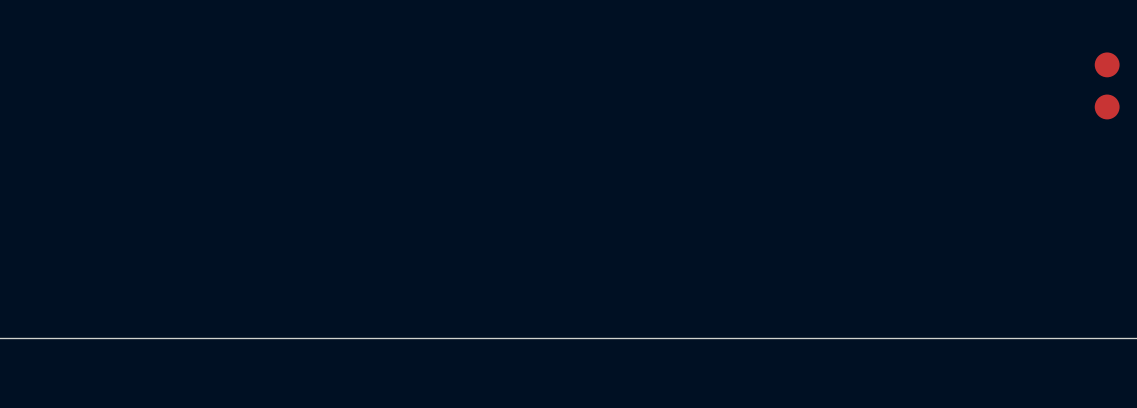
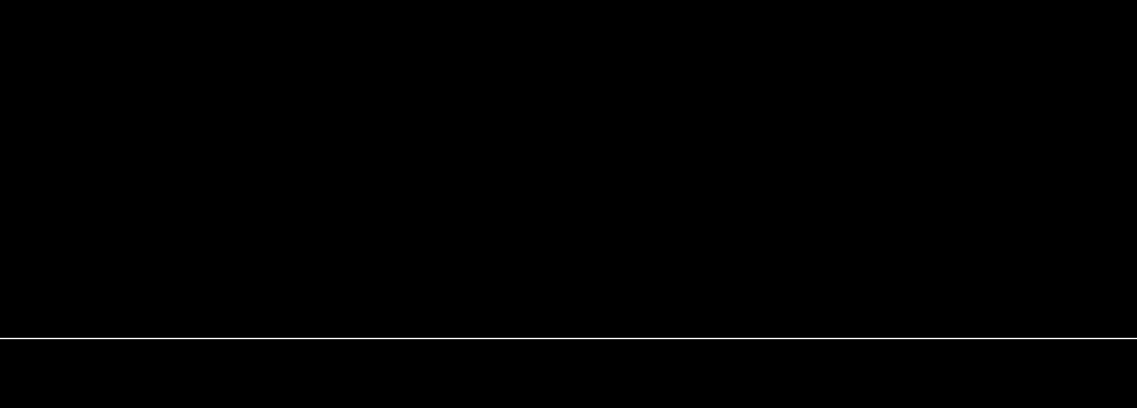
part: (1107, 64) -> none
part: (1107, 106) -> none

